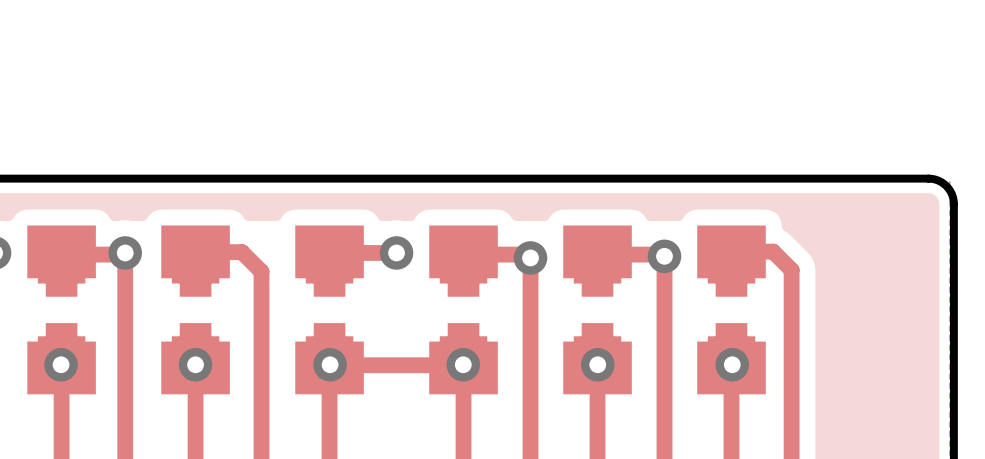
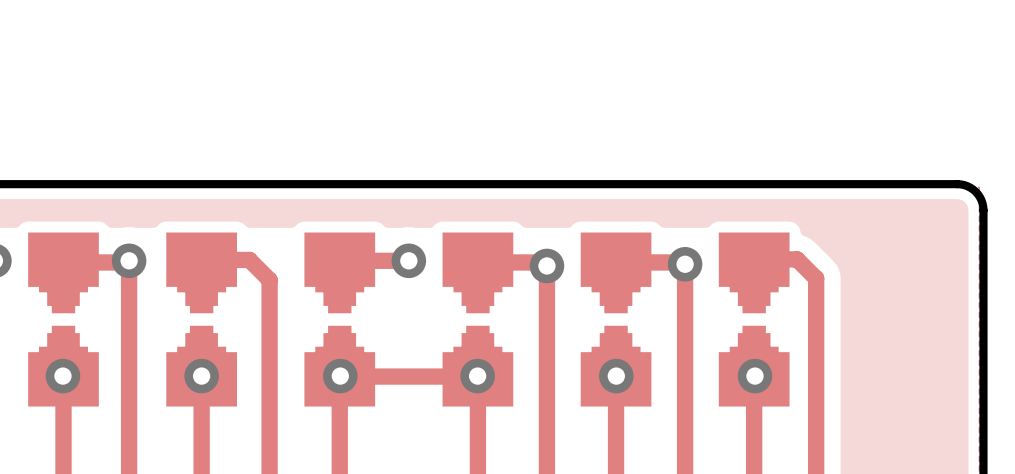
part footprint: [27, 225, 96, 395] -> [28, 232, 99, 407]
part footprint: [161, 225, 230, 395] -> [166, 232, 237, 407]
part footprint: [295, 225, 364, 395] -> [304, 232, 376, 407]
part footprint: [429, 225, 498, 395] -> [442, 232, 514, 407]
part footprint: [563, 225, 632, 395] -> [580, 232, 652, 407]
part footprint: [697, 225, 766, 395] -> [718, 232, 790, 407]

